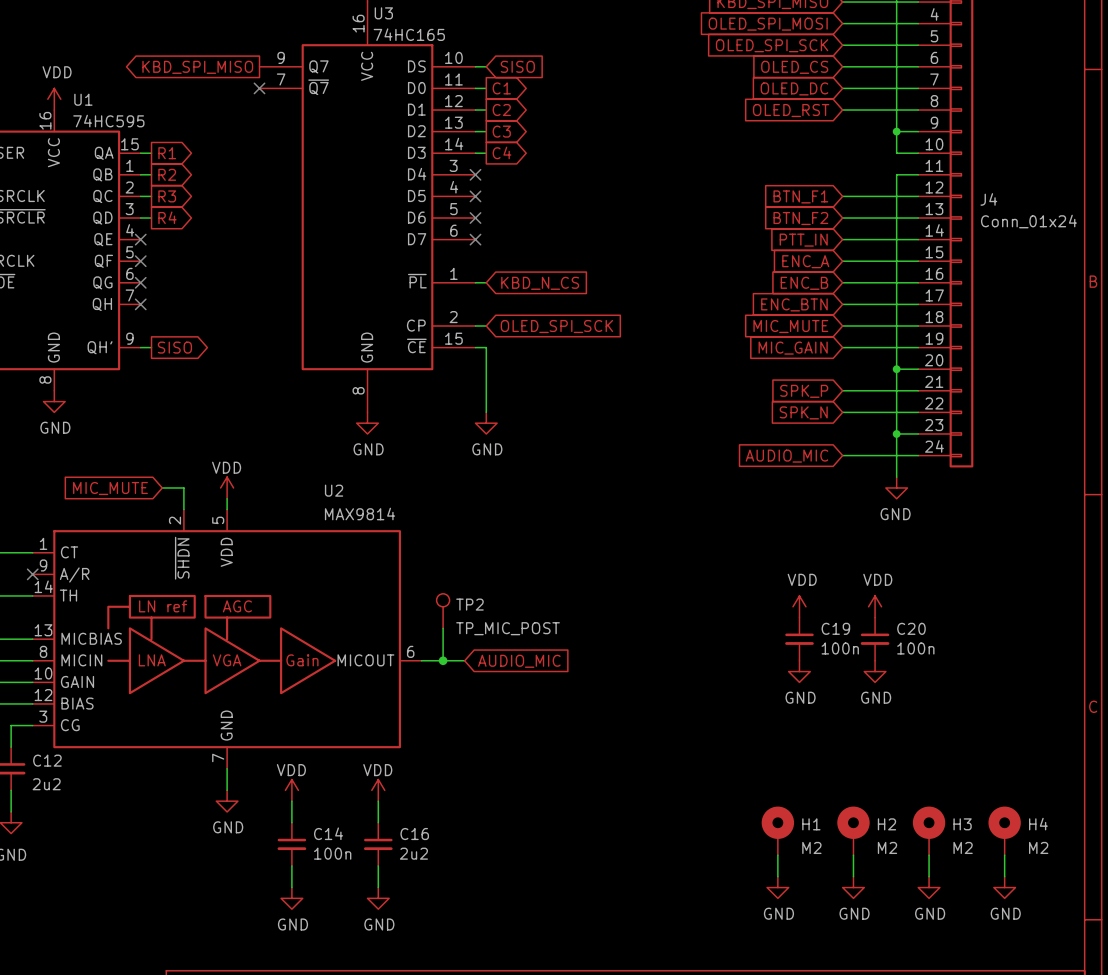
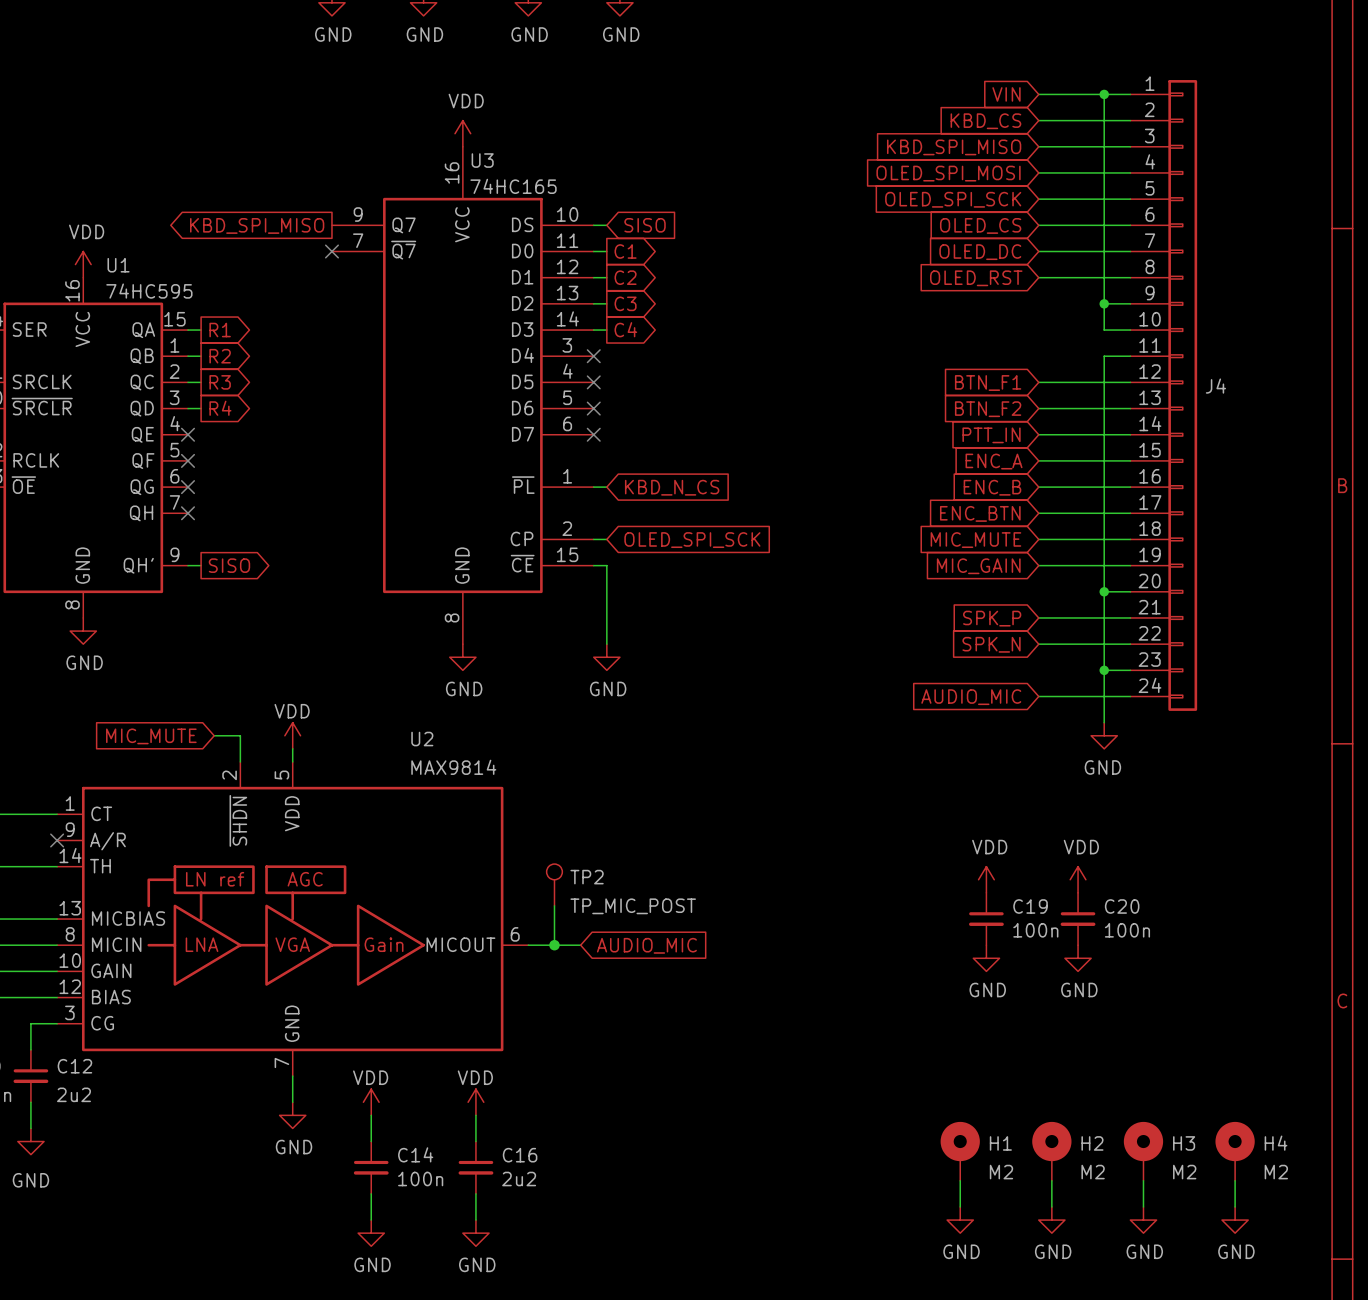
J4 value: Conn_01x24 (1028, 221) -> none

